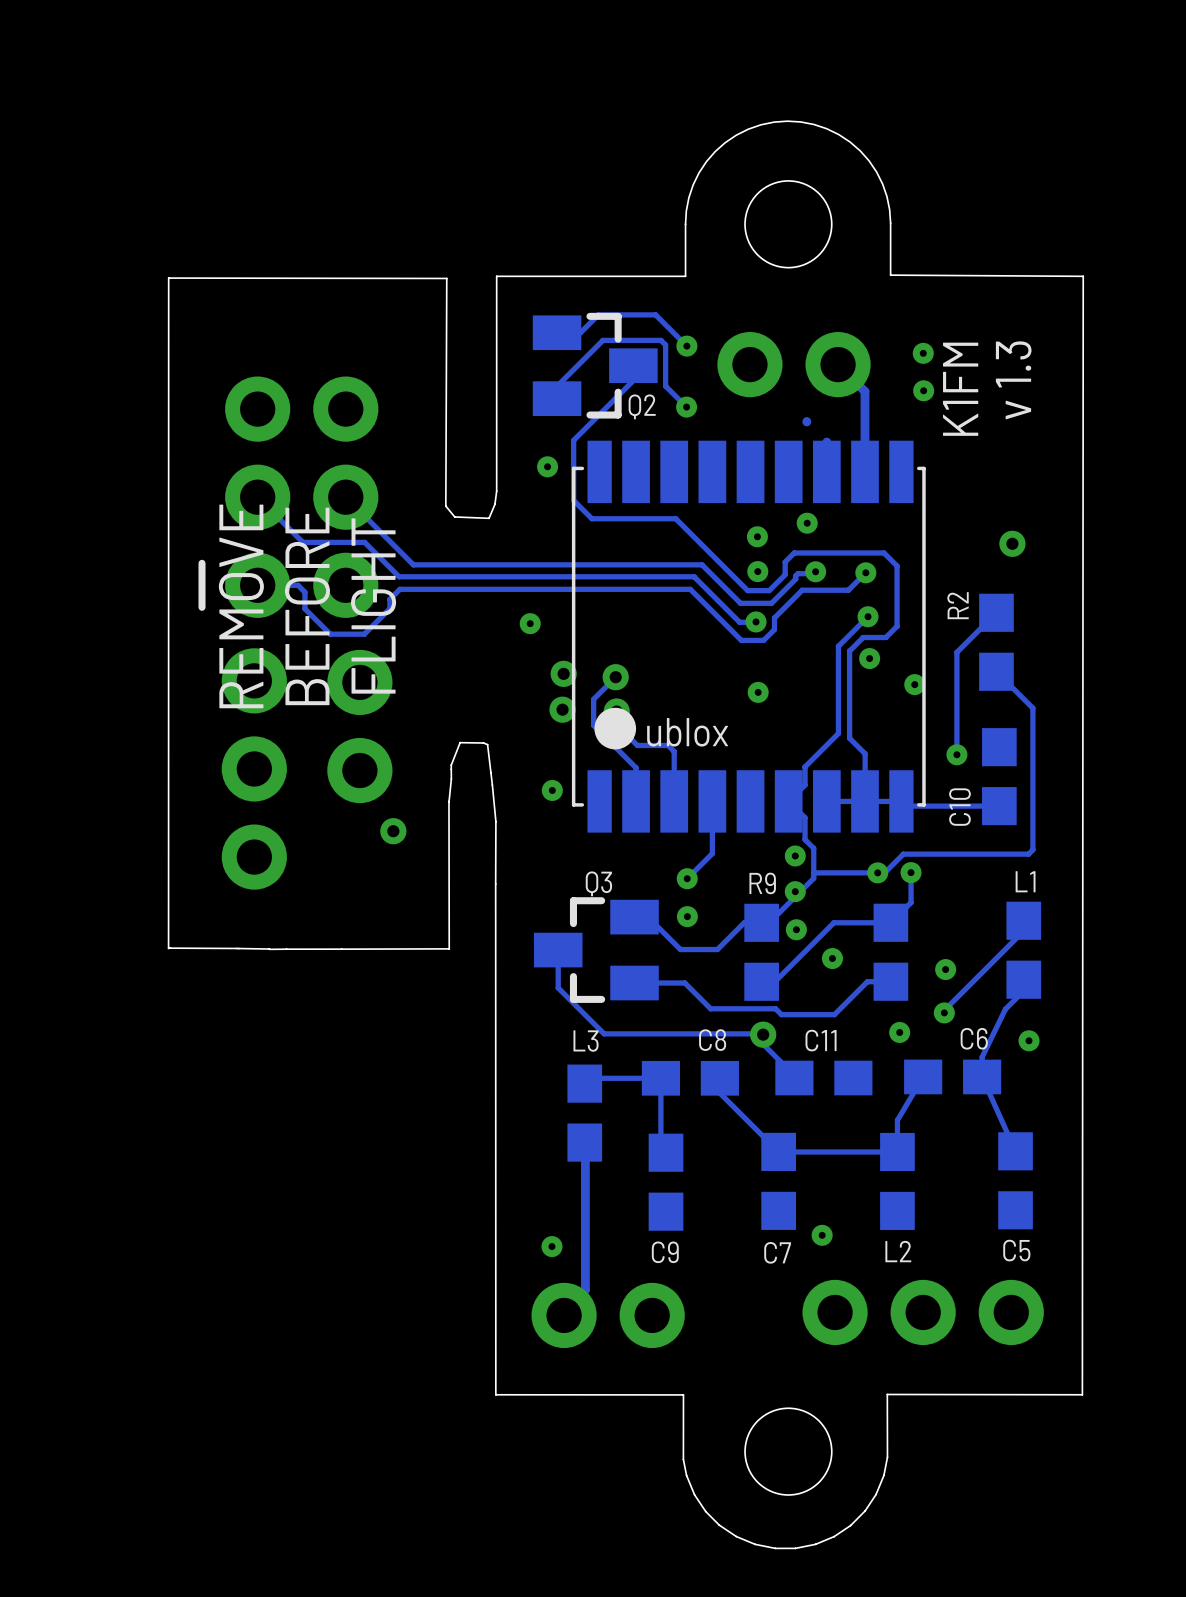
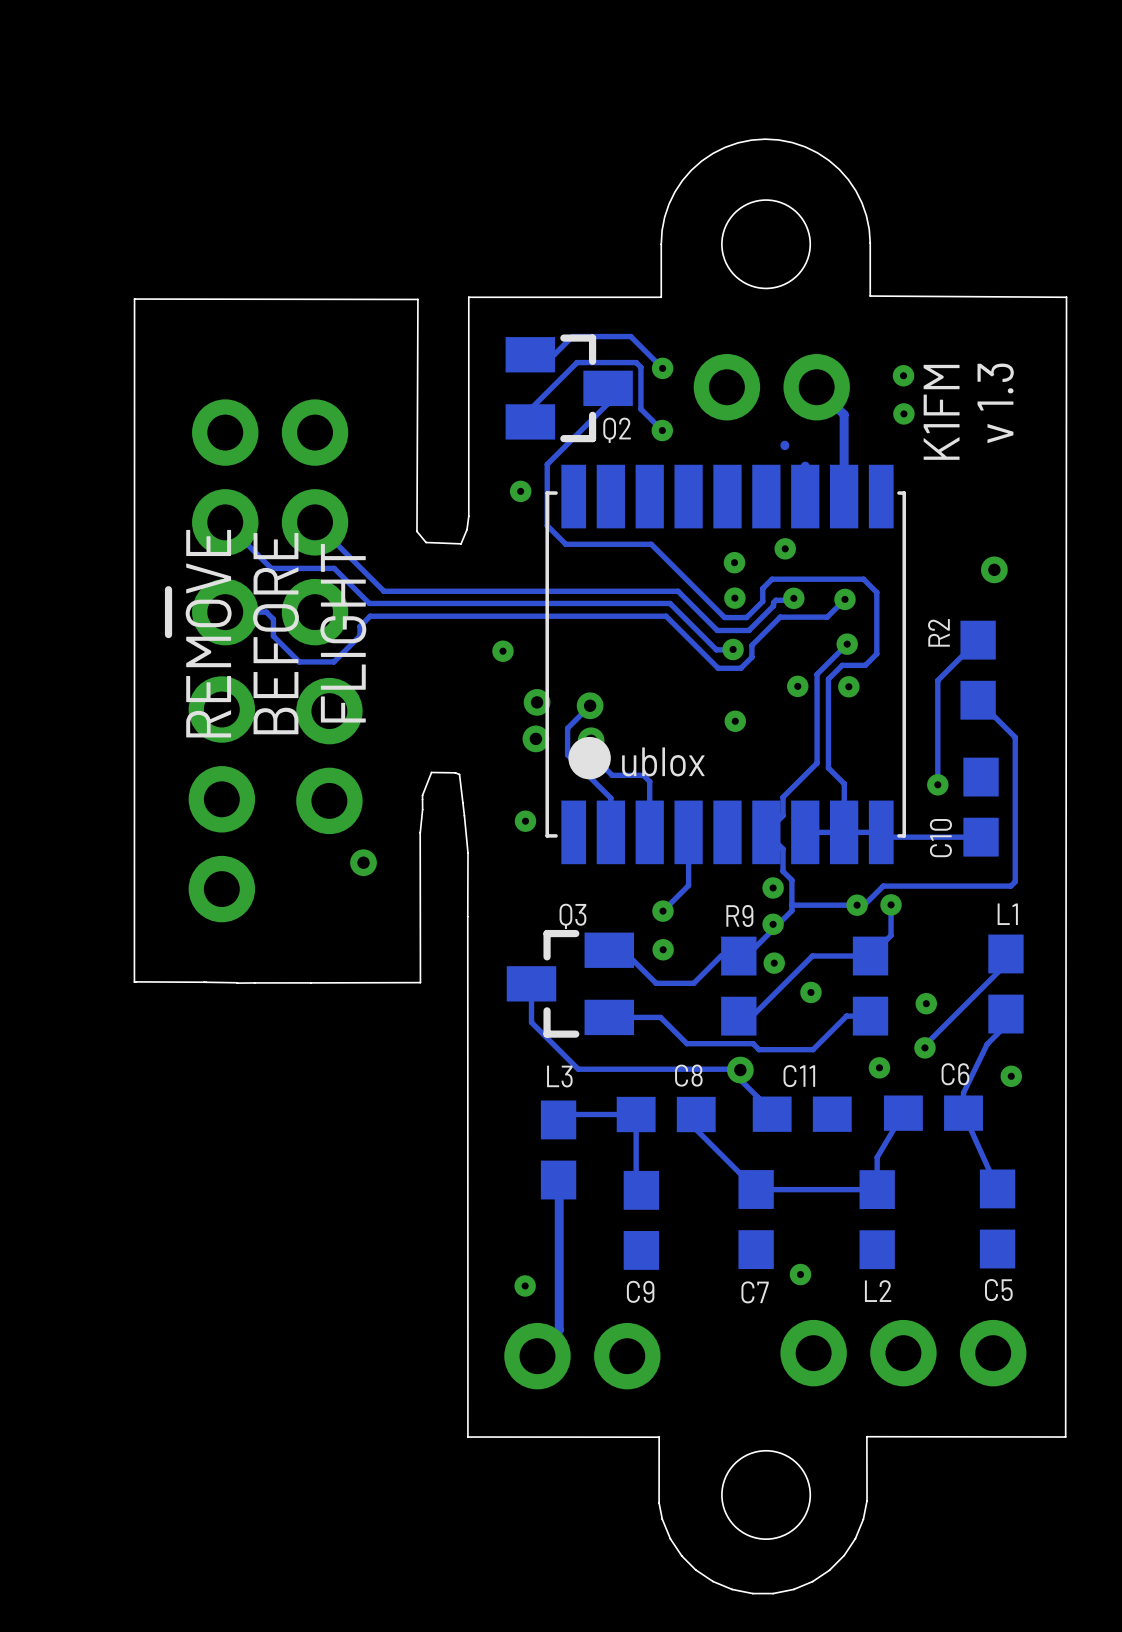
via position: (914, 684) -> (797, 686)

